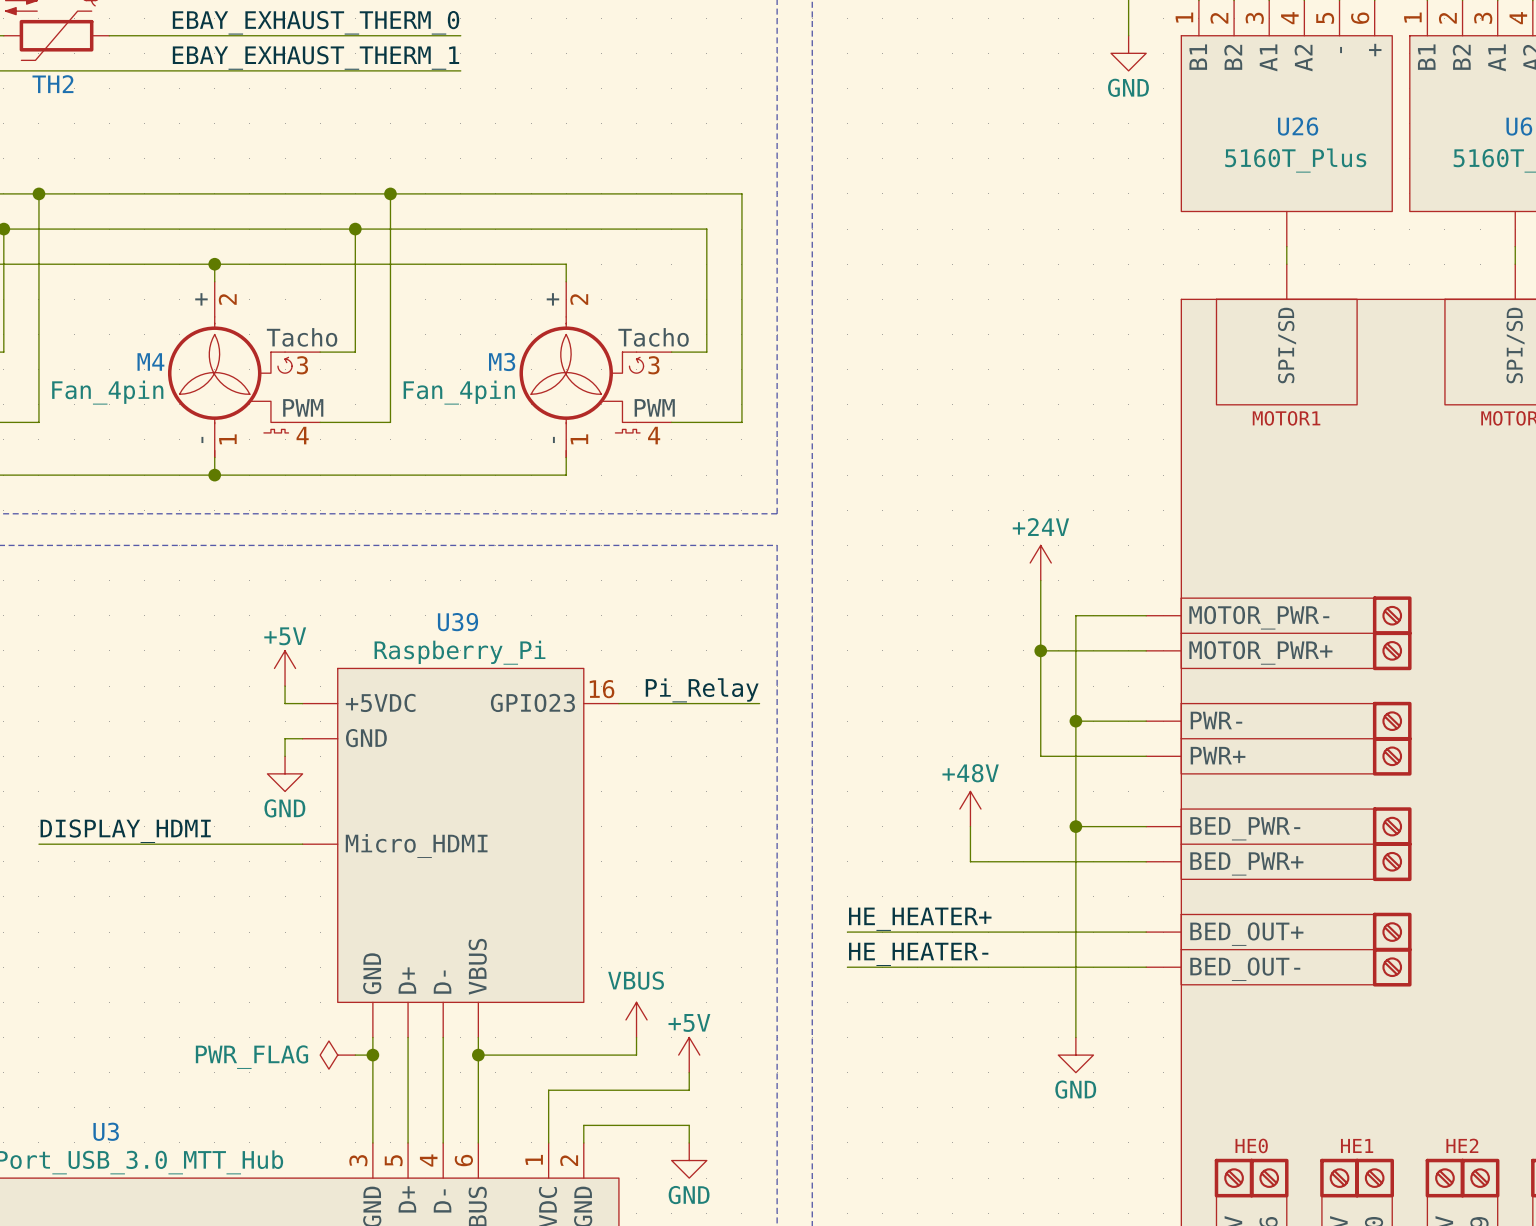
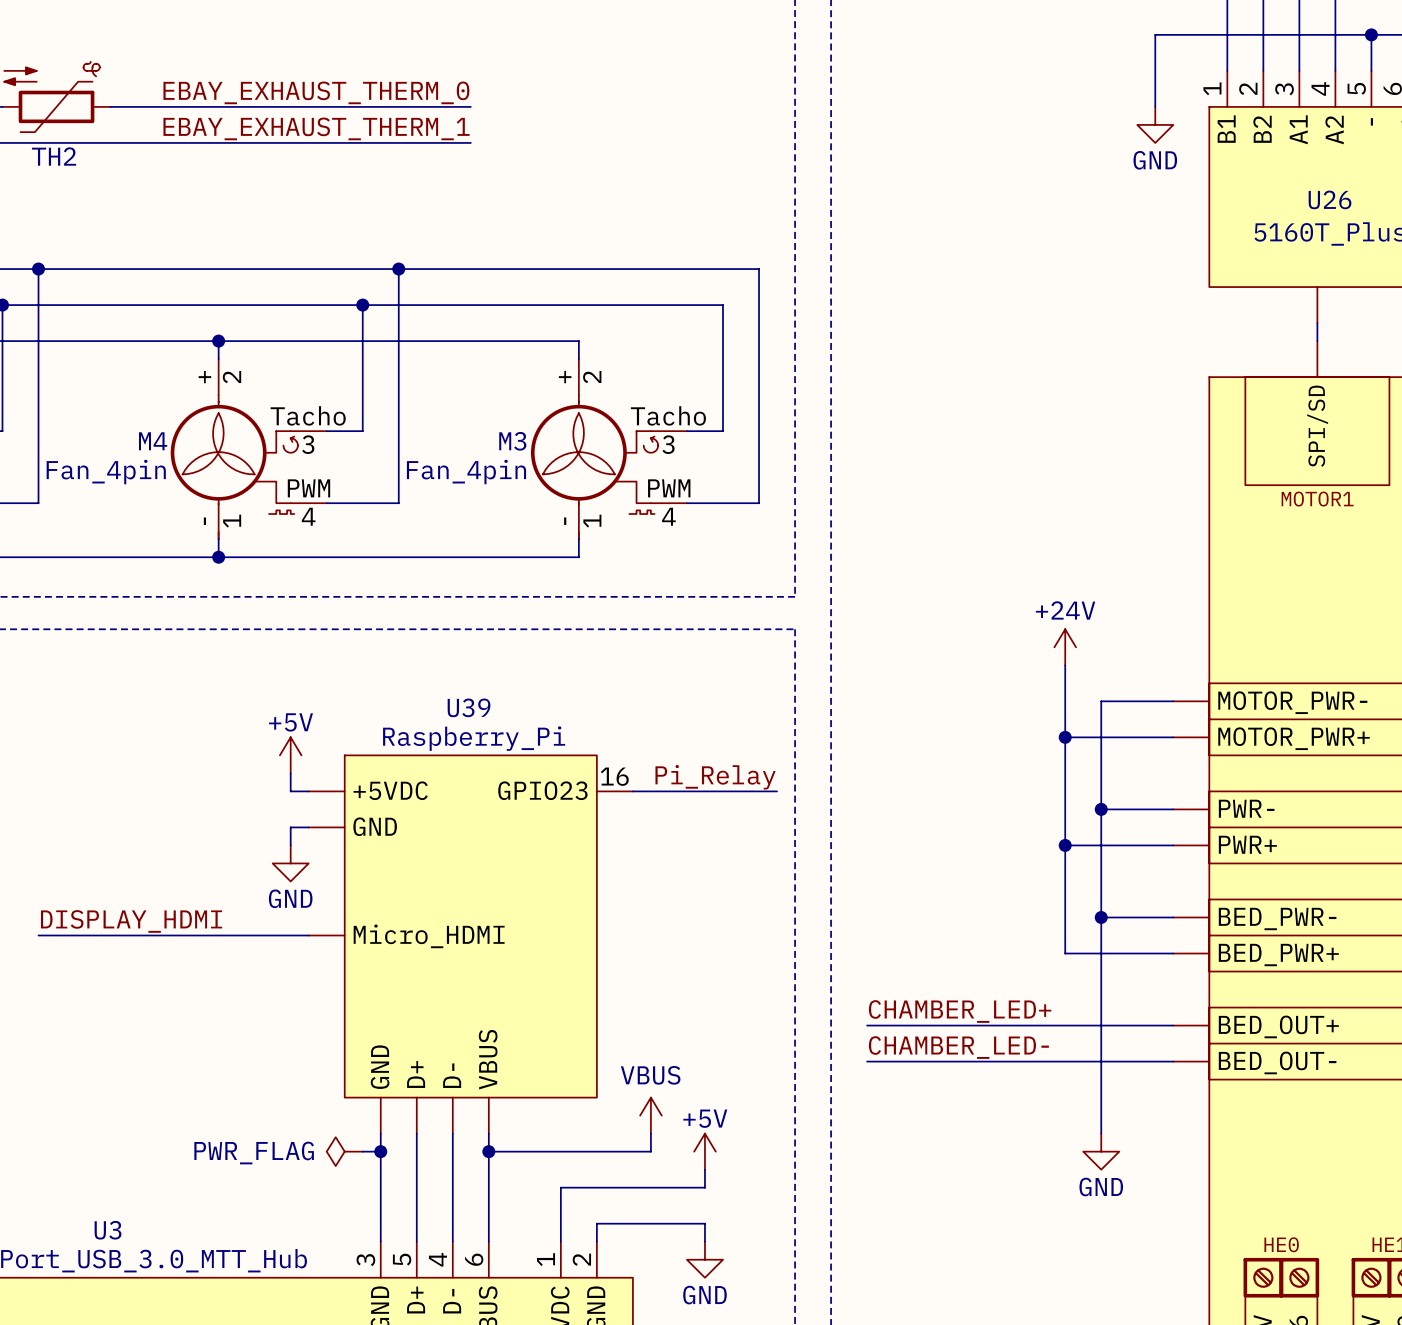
junction: none -> (1065, 845)
power symbol: +48V (970, 809) -> none
wire: (970, 826) (970, 861) (1040, 861) -> (1065, 845) (1065, 953)
label: HE_HEATER+ (920, 919) -> CHAMBER_LED+ (960, 1011)
label: HE_HEATER- (918, 954) -> CHAMBER_LED- (958, 1047)

